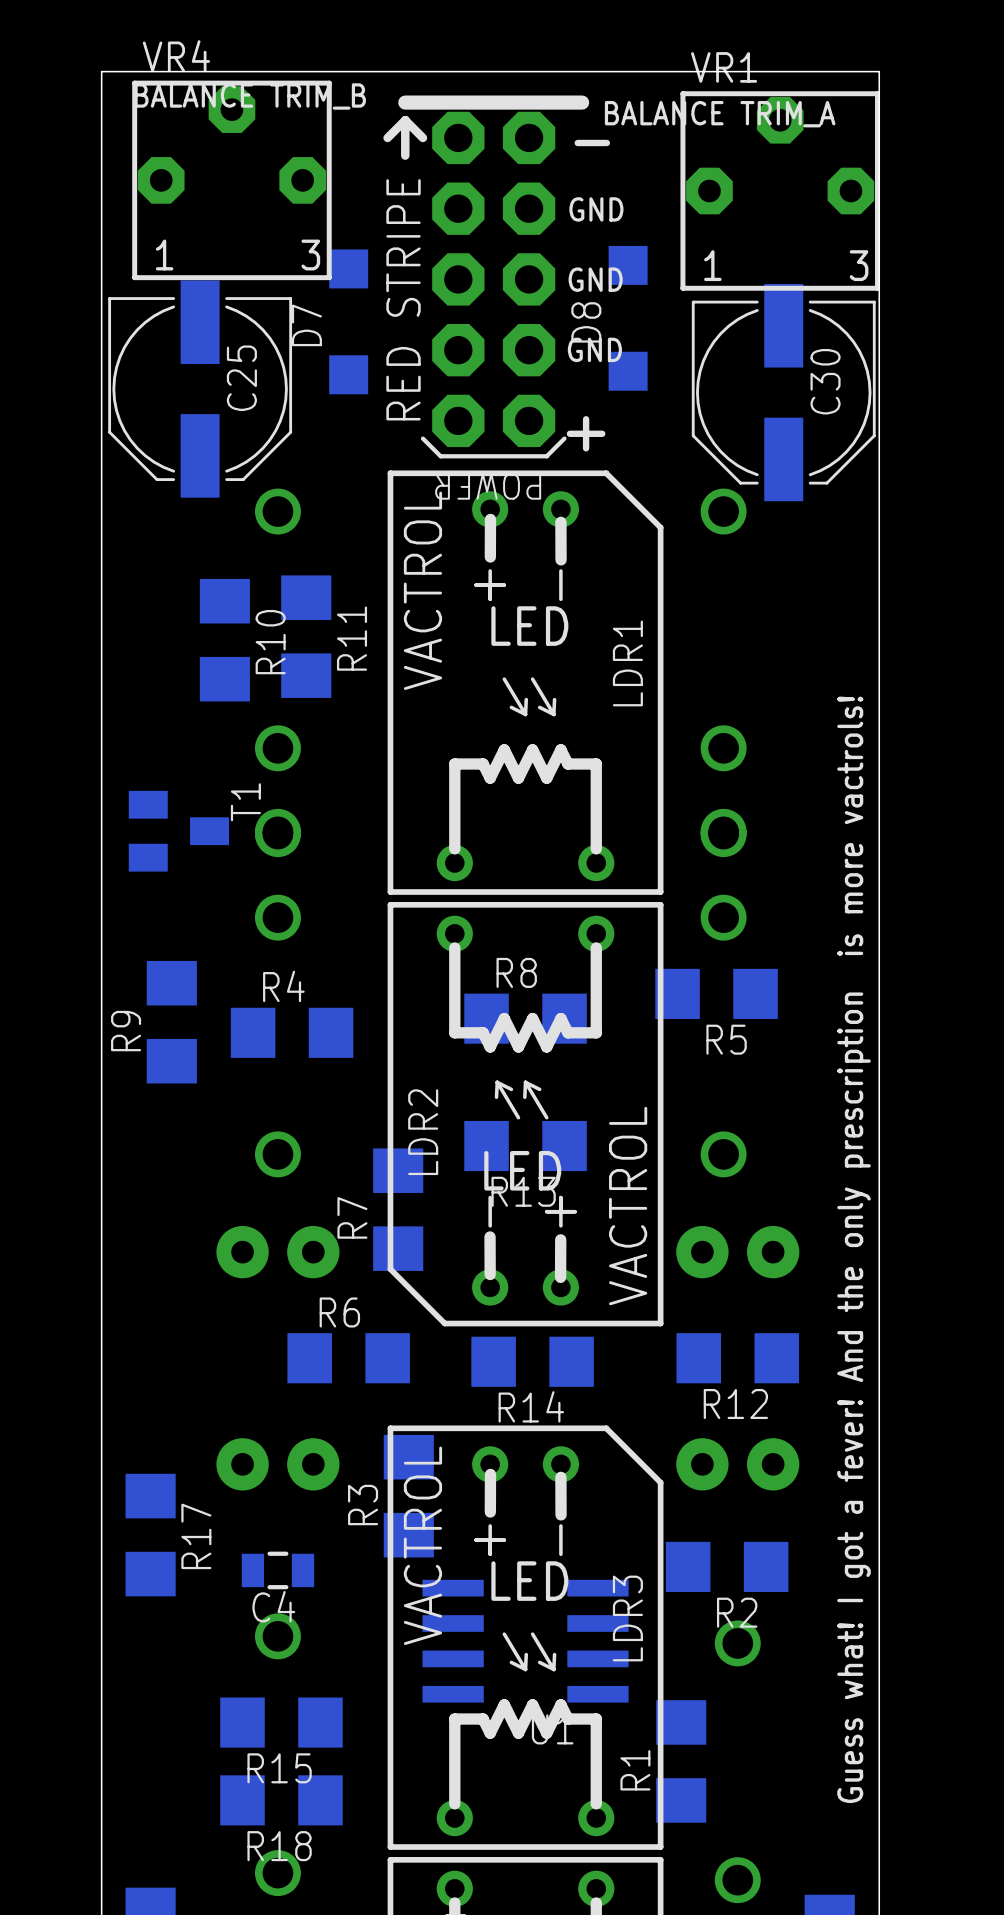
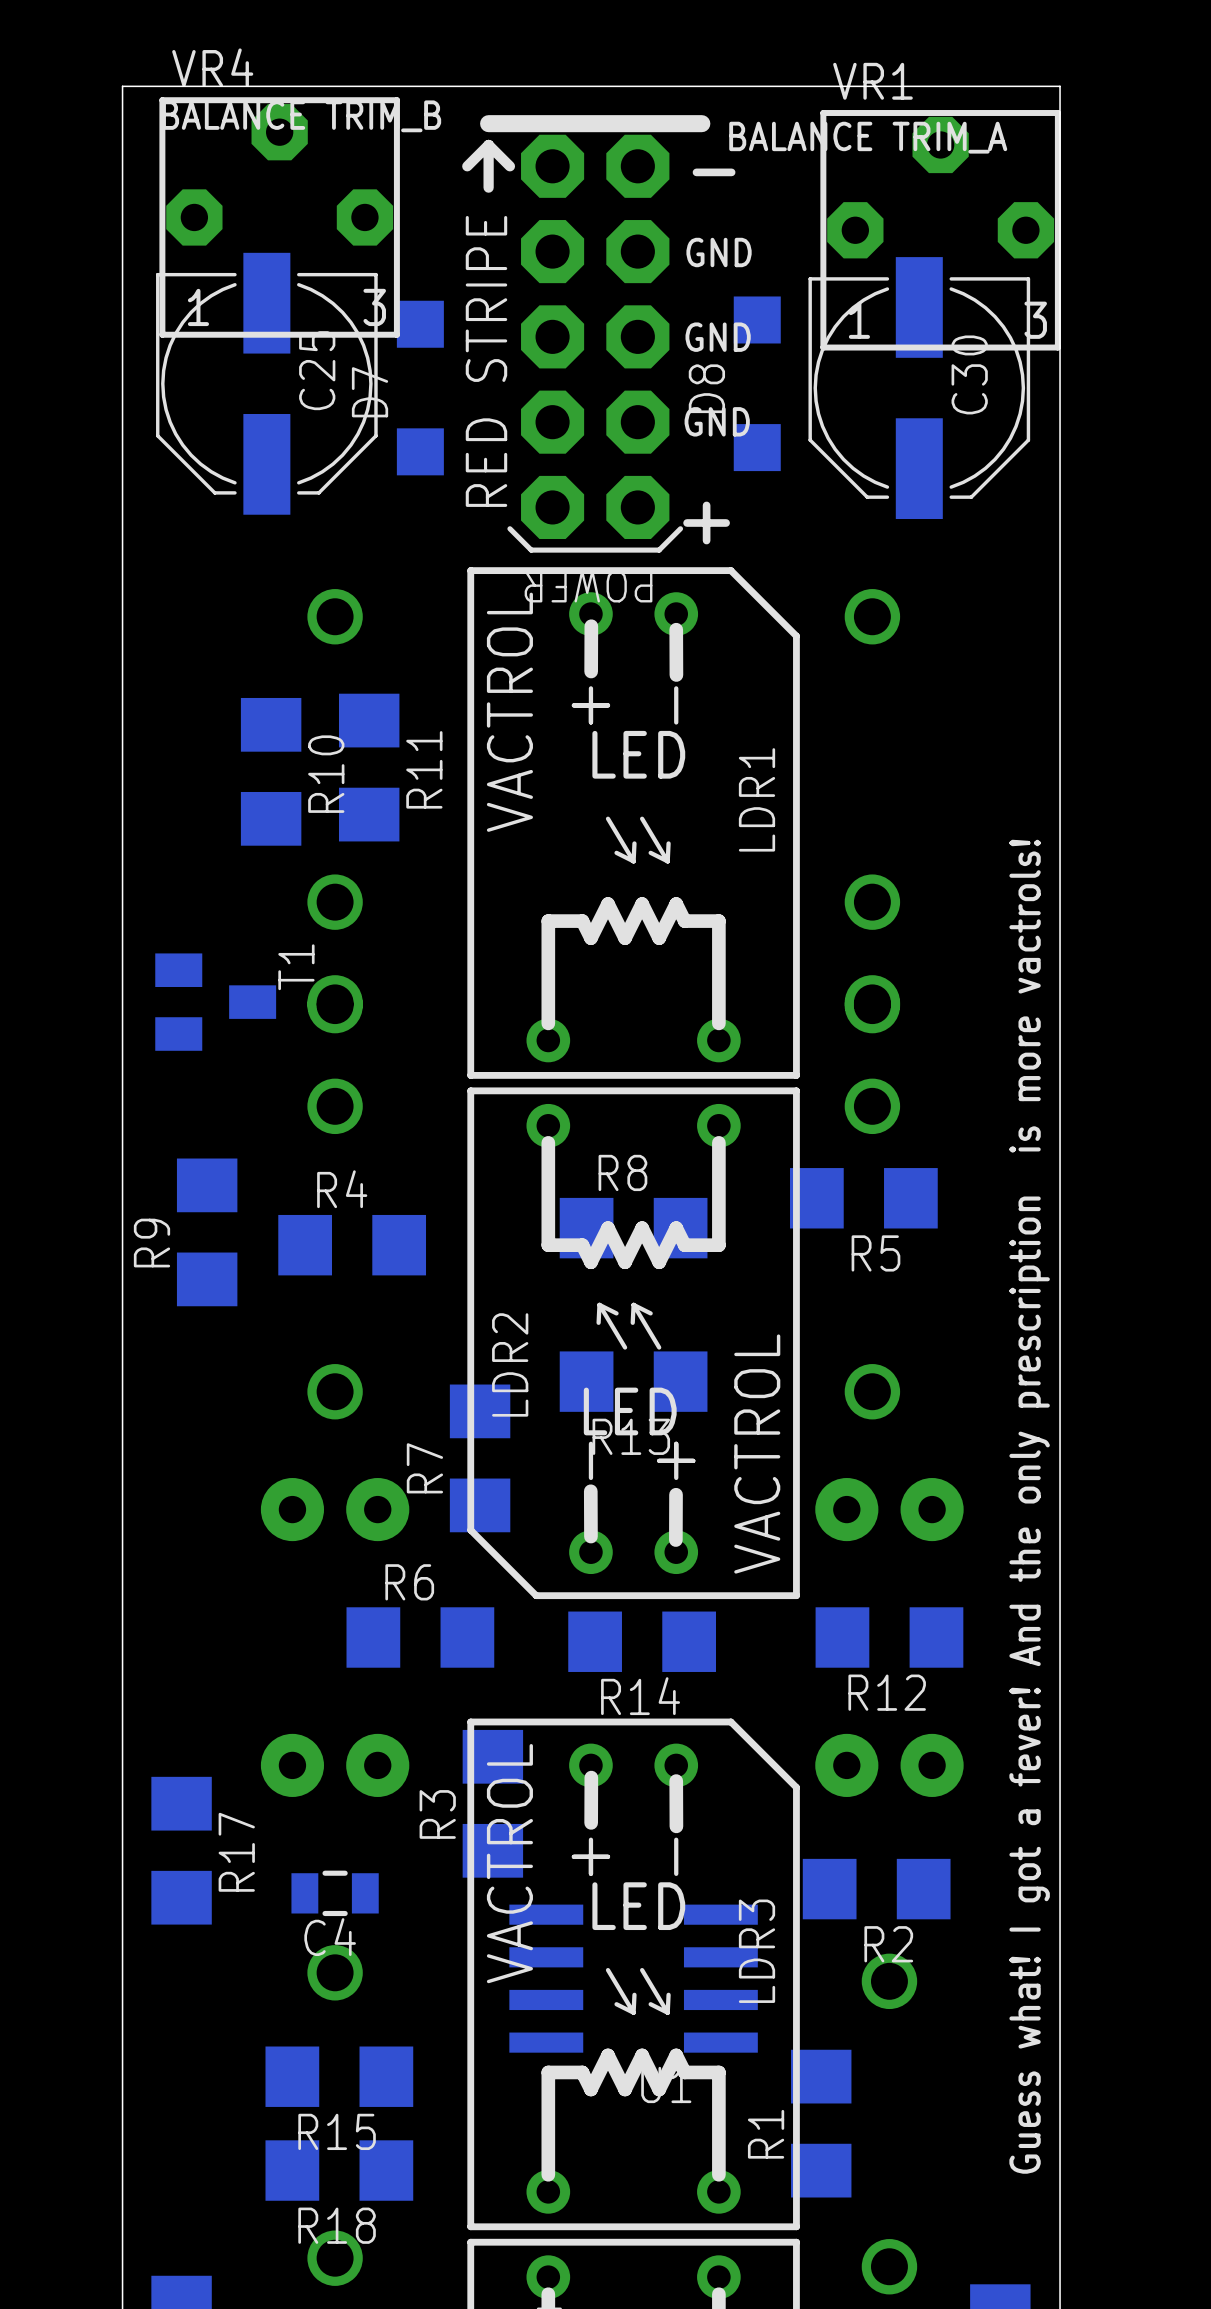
C25 position: (200, 389) -> (266, 383)
C30 position: (783, 392) -> (919, 388)

